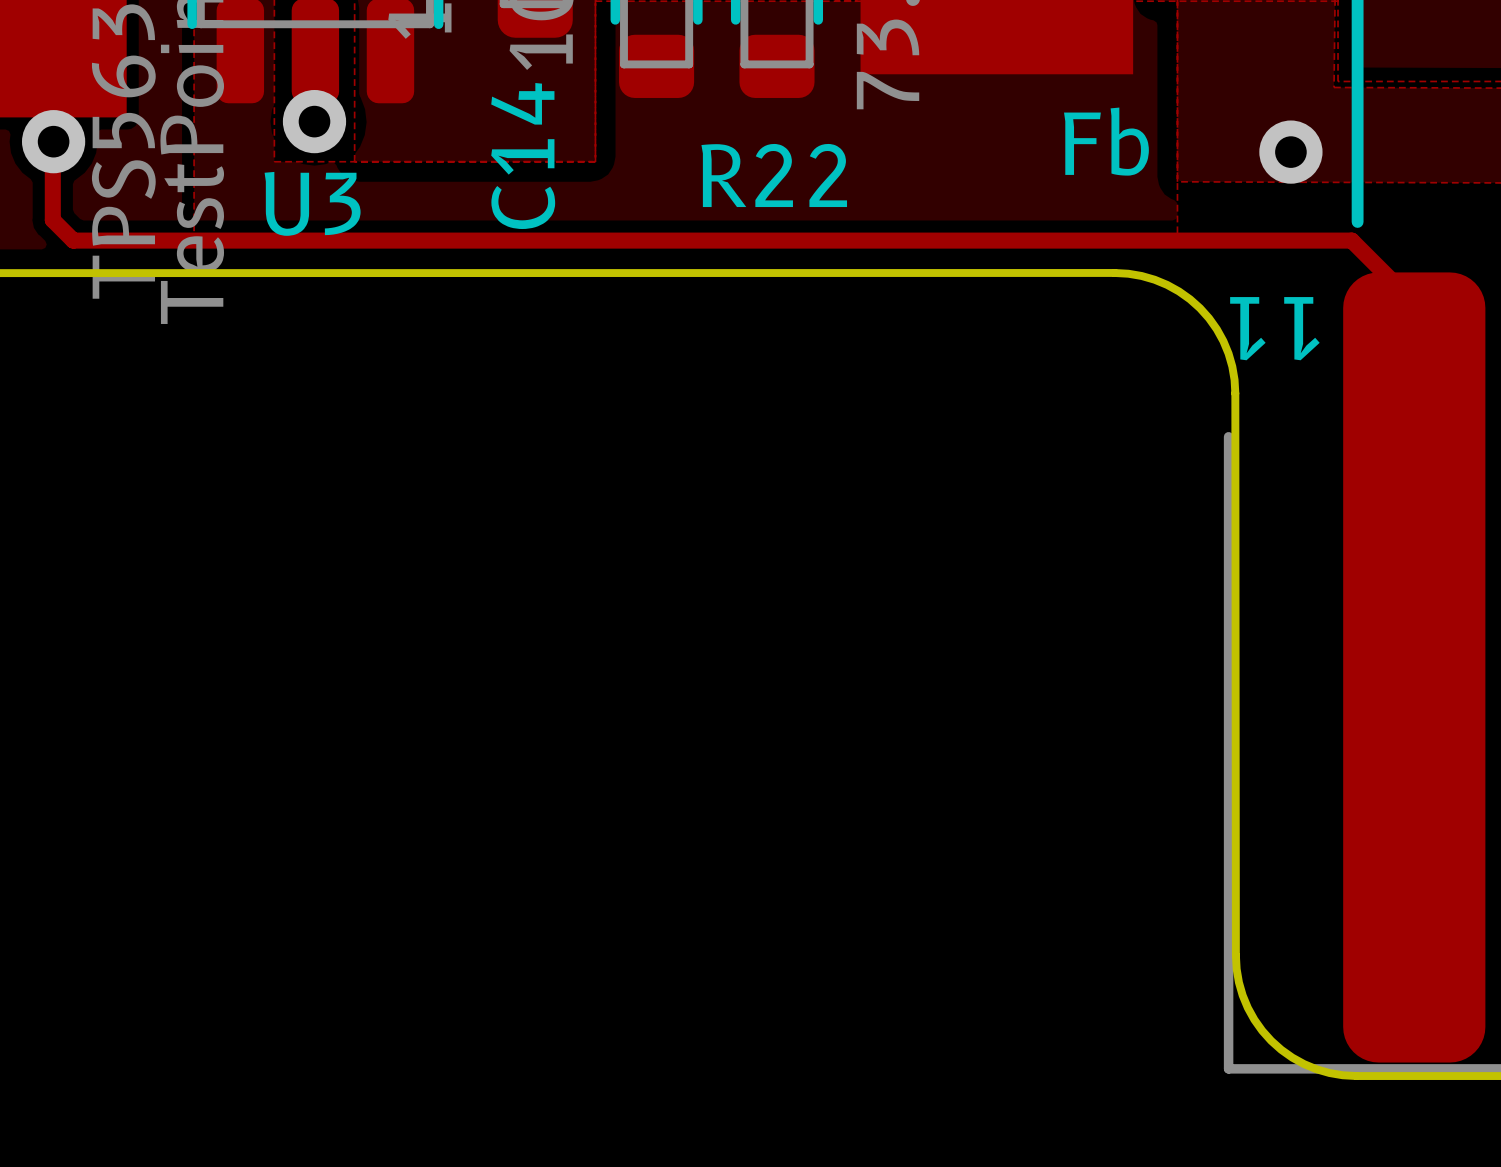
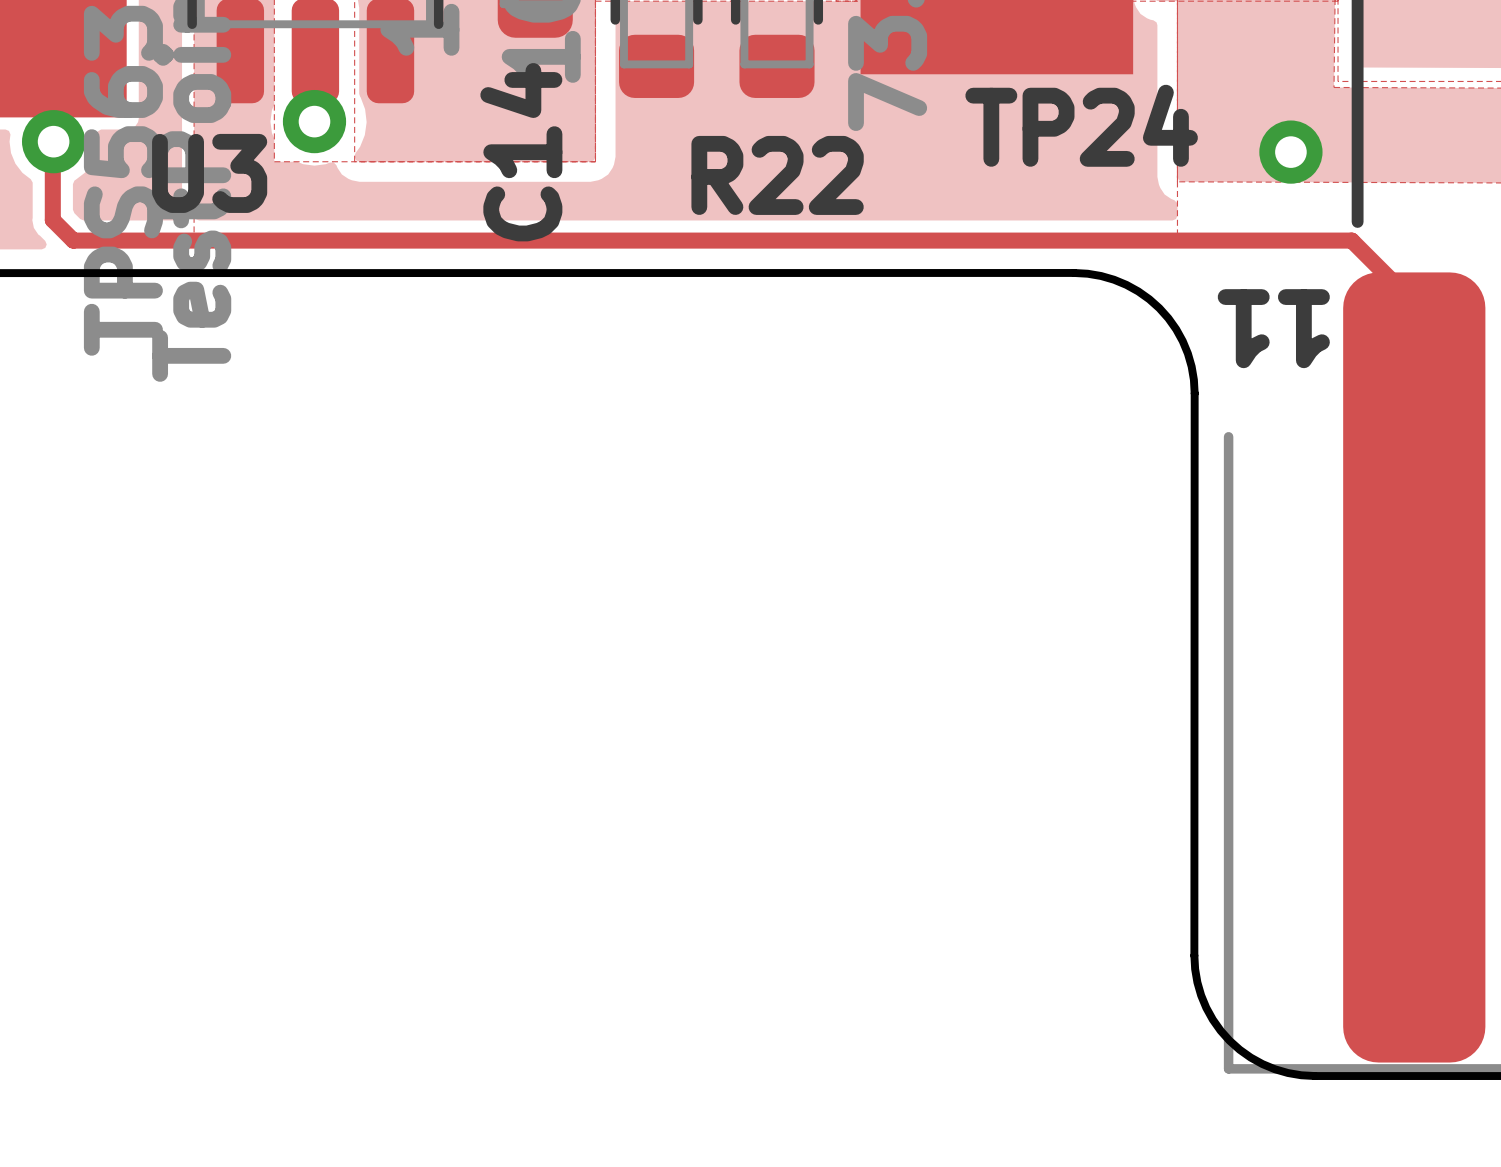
TP24 name: none -> TP24 (1081, 125)
text: Fb (1106, 141) -> none
U3 name position: U3 (312, 203) -> U3 (209, 173)
board edge: (1074, 272) (1128, 273) (1154, 279) (1167, 284) (1178, 291) (1200, 308) (1216, 329) (1228, 353) (1234, 379) (1235, 393) (1235, 955) (1238, 982) (1247, 1007) (1254, 1019) (1271, 1040) (1281, 1049) (1304, 1064) (1316, 1069) (1342, 1075) (1356, 1076) -> (1074, 272) (1101, 275) (1114, 279) (1126, 284) (1149, 299) (1168, 318) (1176, 329) (1182, 341) (1191, 366) (1194, 393) (1194, 955) (1197, 982) (1201, 995) (1212, 1019) (1220, 1030) (1239, 1049) (1262, 1064) (1275, 1069) (1301, 1075) (1356, 1076)

